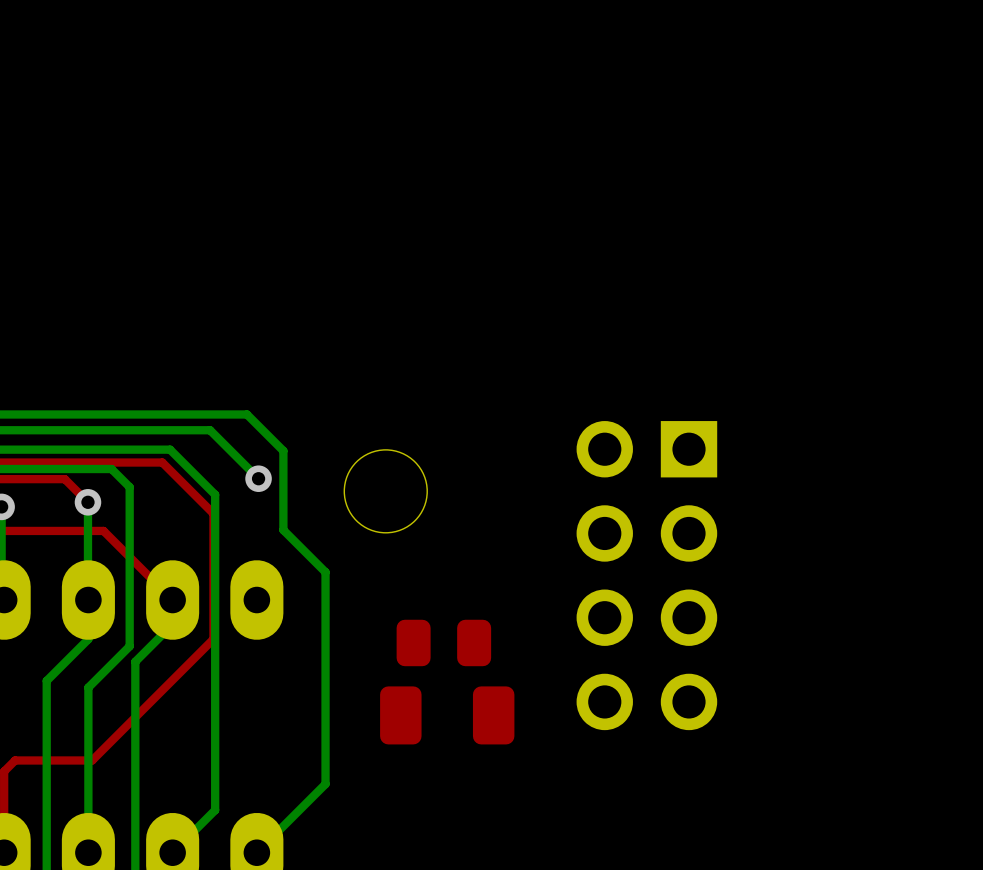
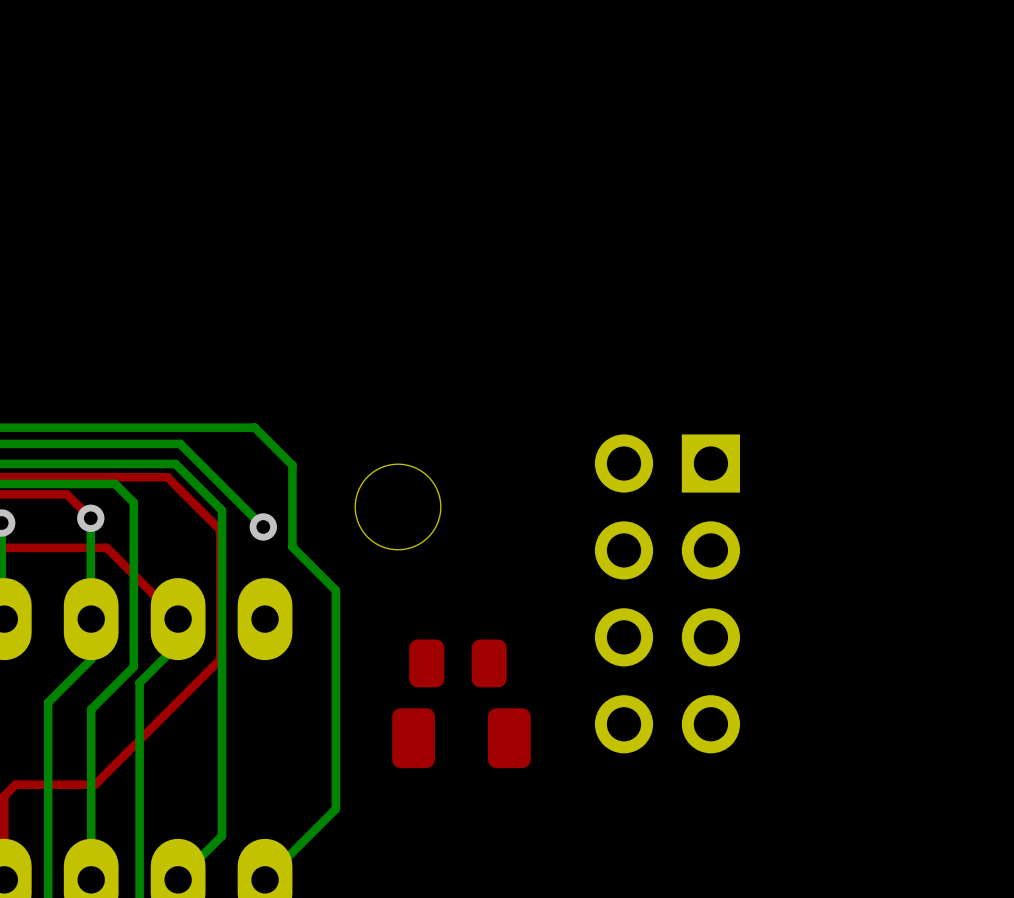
bottom track: (174, 430) (210, 430) (258, 478) -> (180, 443) (263, 526)
via position: (258, 478) -> (263, 526)

